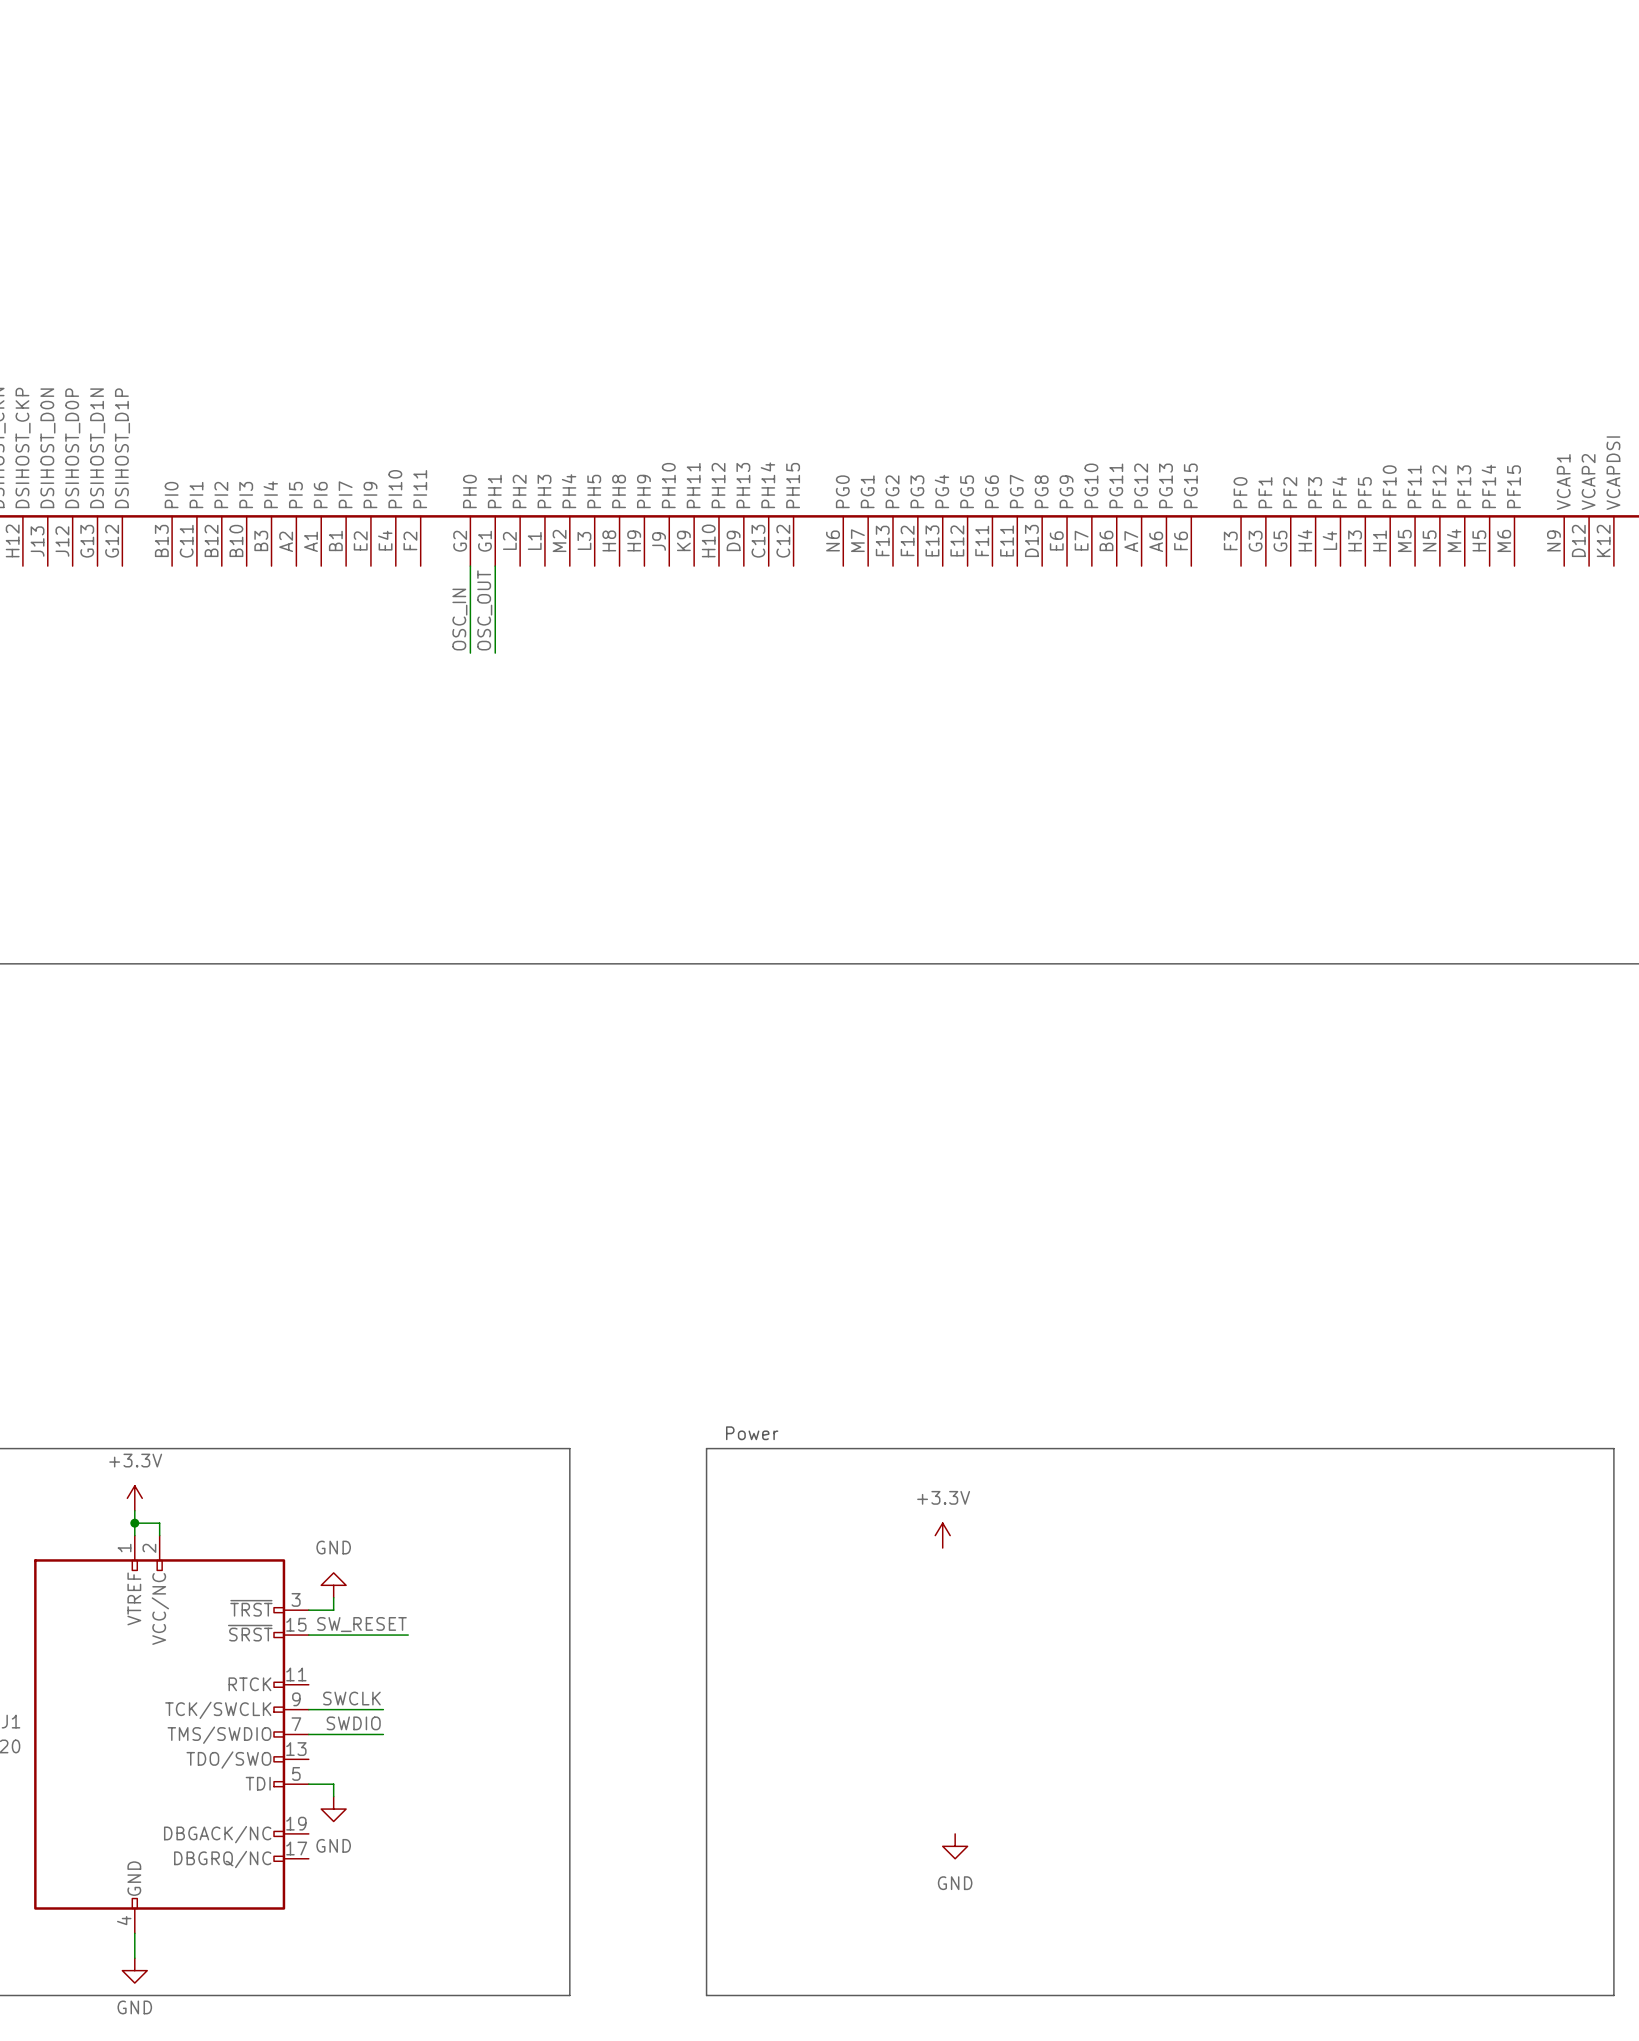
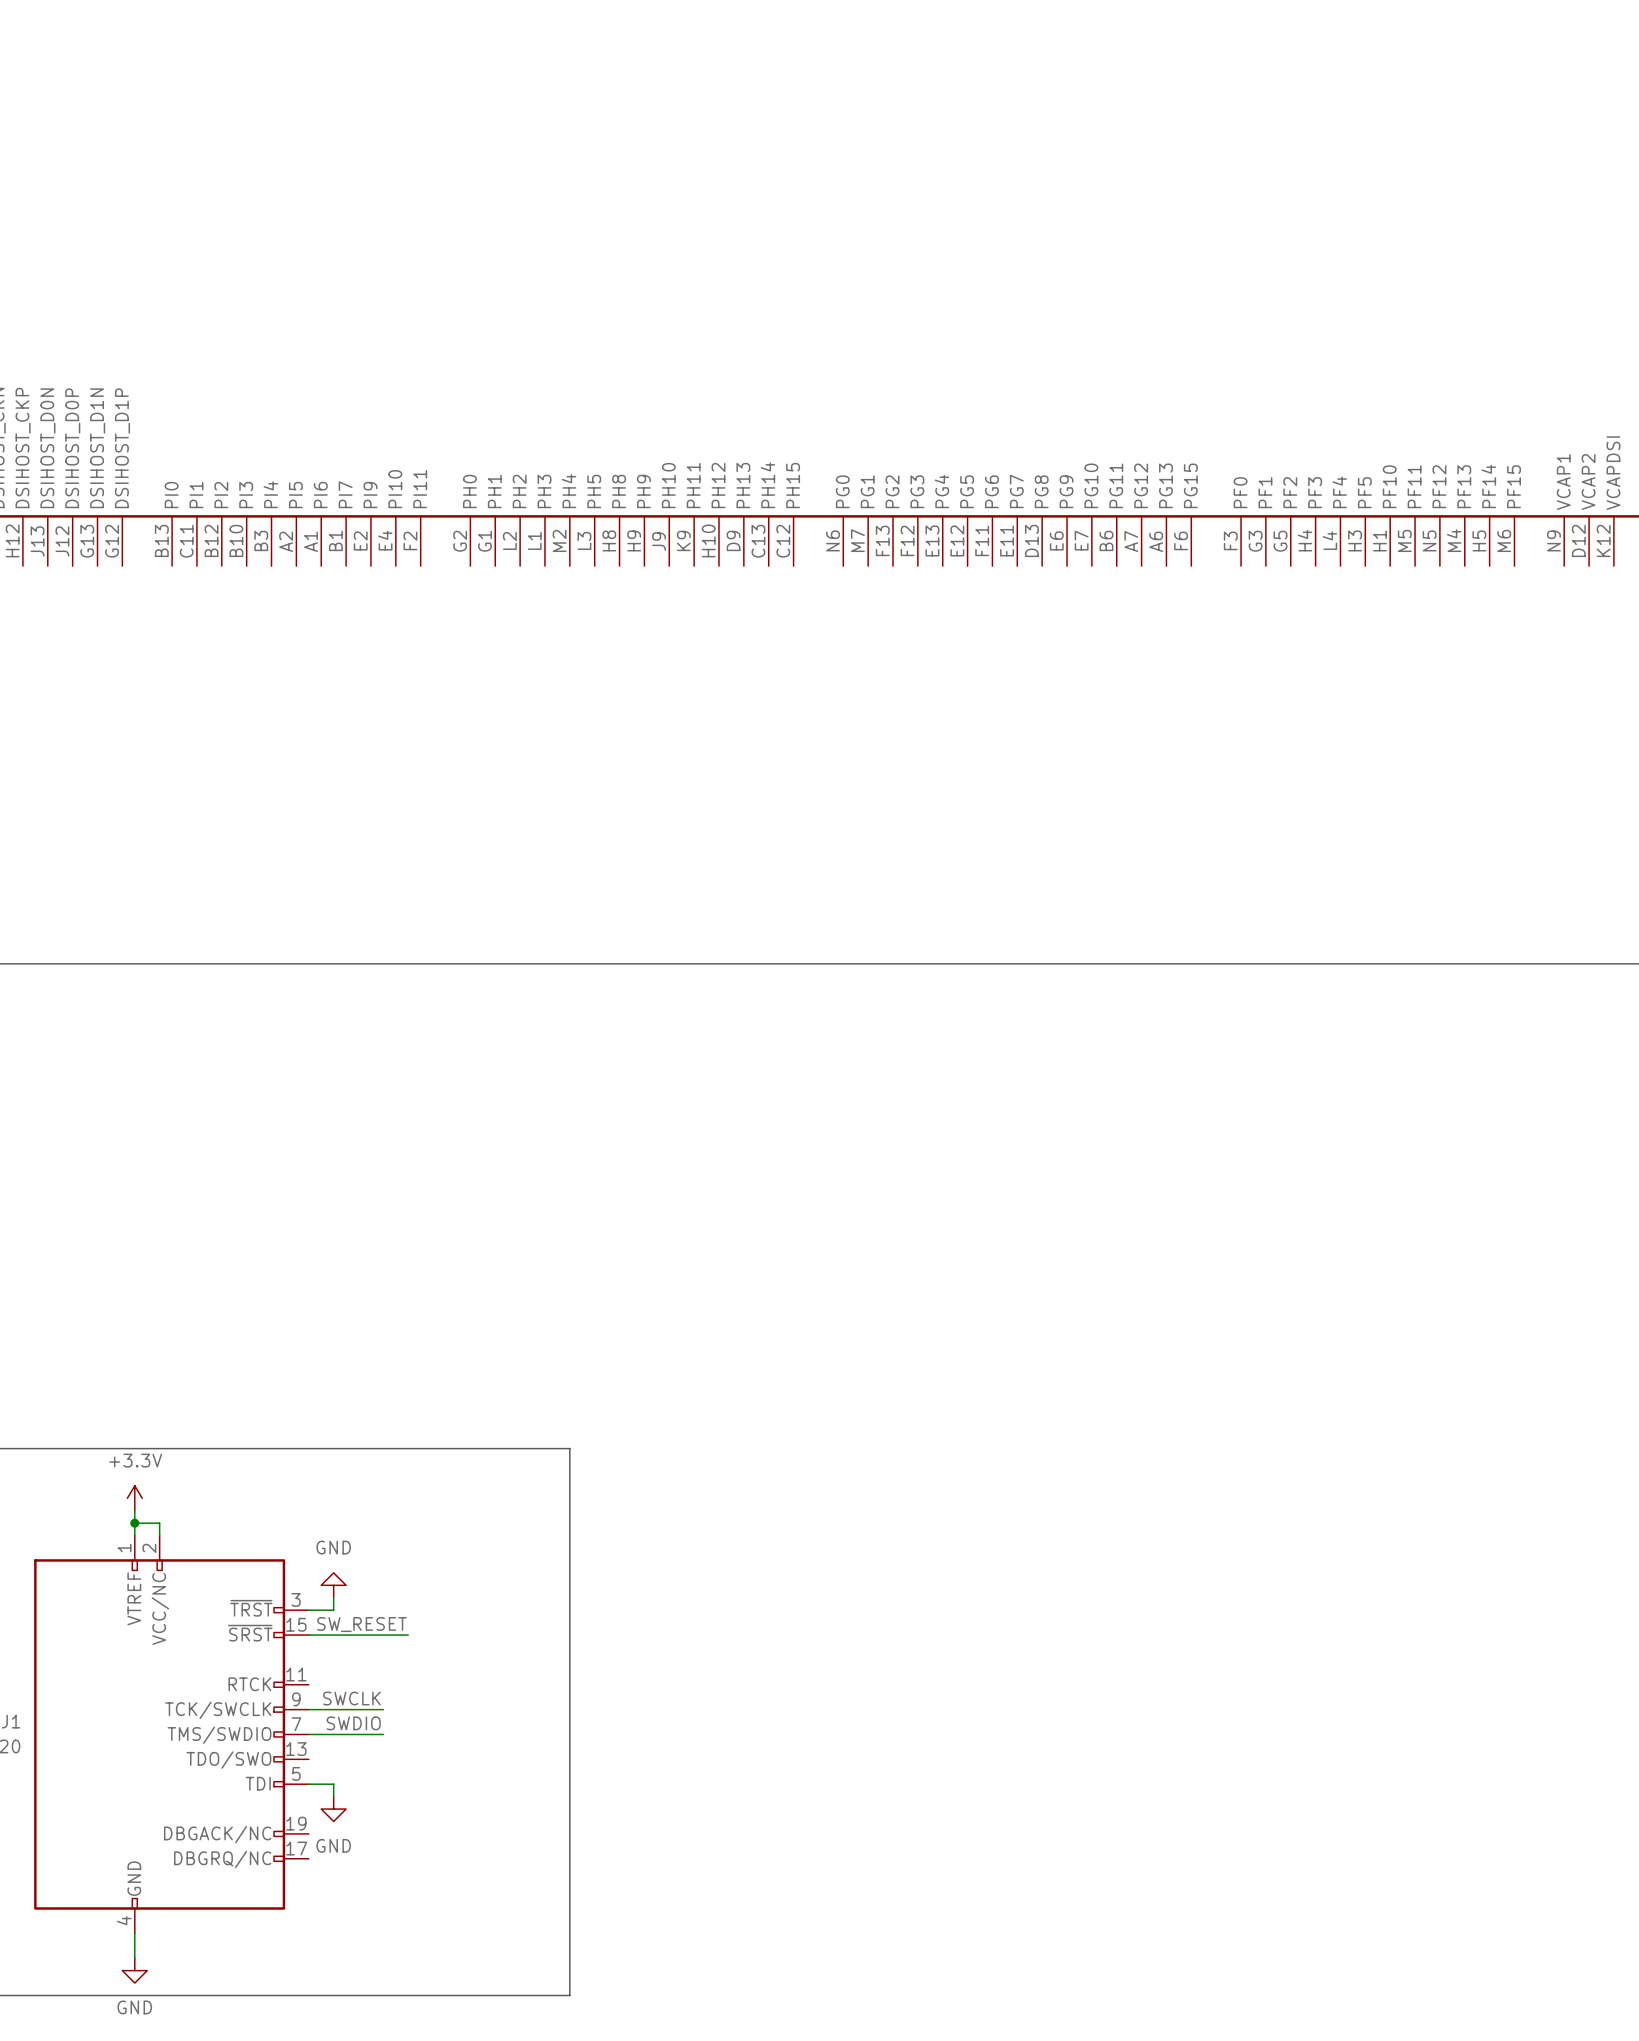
wire: (470, 566) (470, 653) -> none
wire: (495, 566) (495, 653) -> none
label: OSC_OUT (484, 610) -> none
label: OSC_IN (459, 619) -> none
text: Power (752, 1433) -> none
line: (706, 1448) (1613, 1448) (1613, 1995) (706, 1995) (706, 1448) -> none
power symbol: +3.3V (942, 1535) -> none
power symbol: GND (955, 1846) -> none

